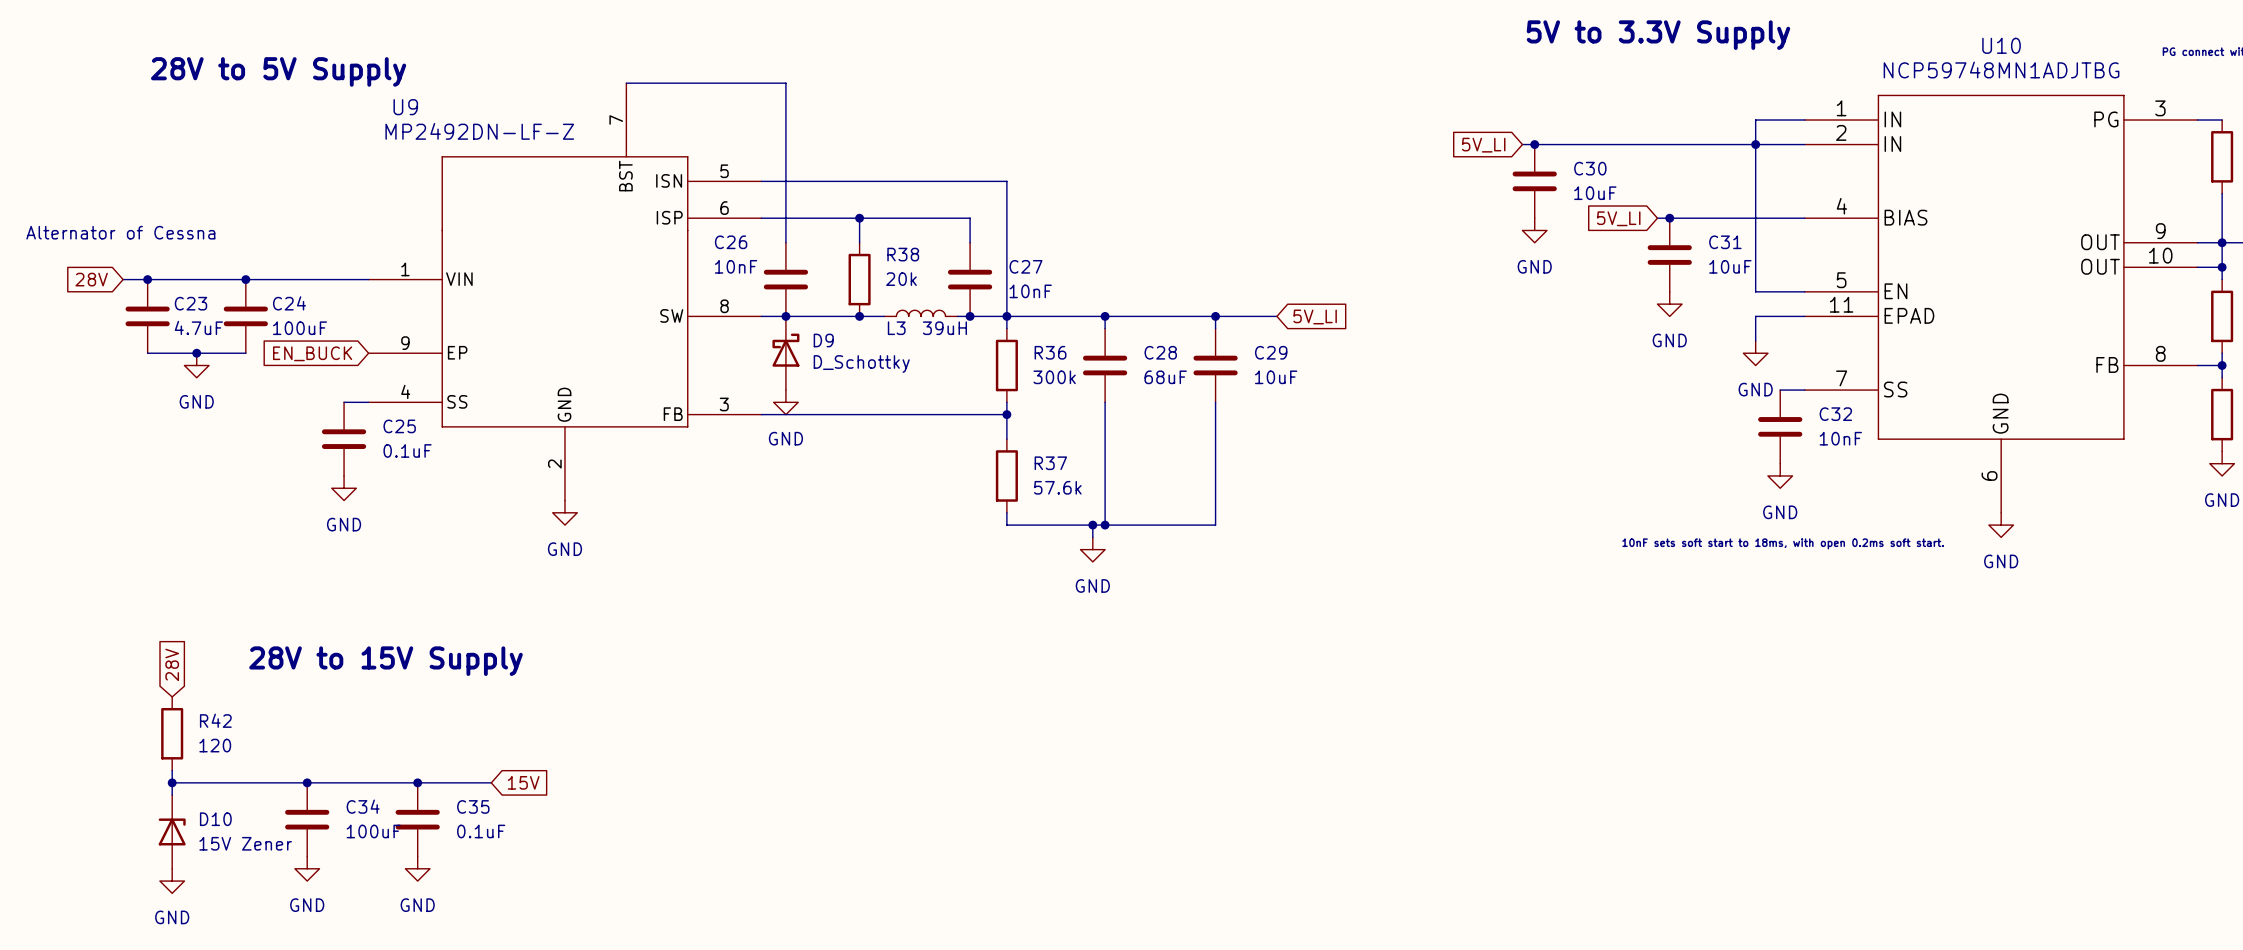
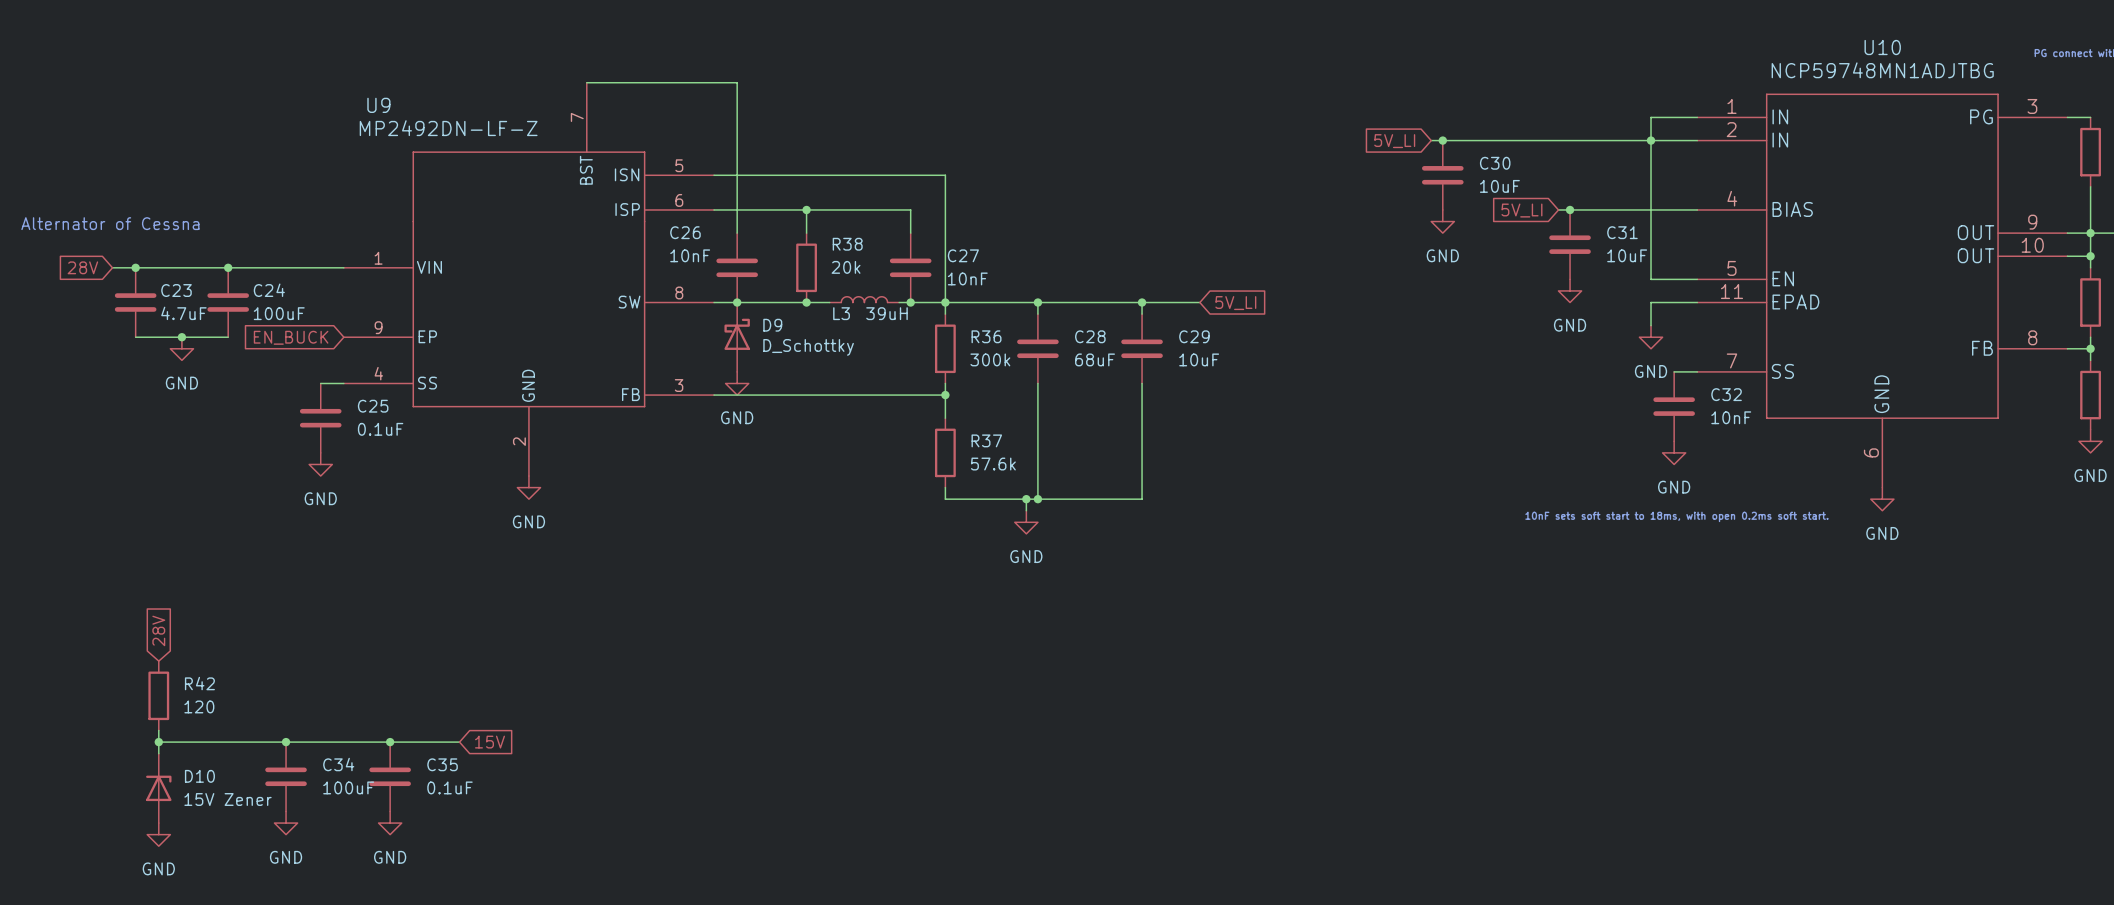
text: 5V to 3.3V Supply (1658, 35) -> none
text: 28V to 5V Supply (278, 71) -> none
text: 28V to 15V Supply (386, 661) -> none

